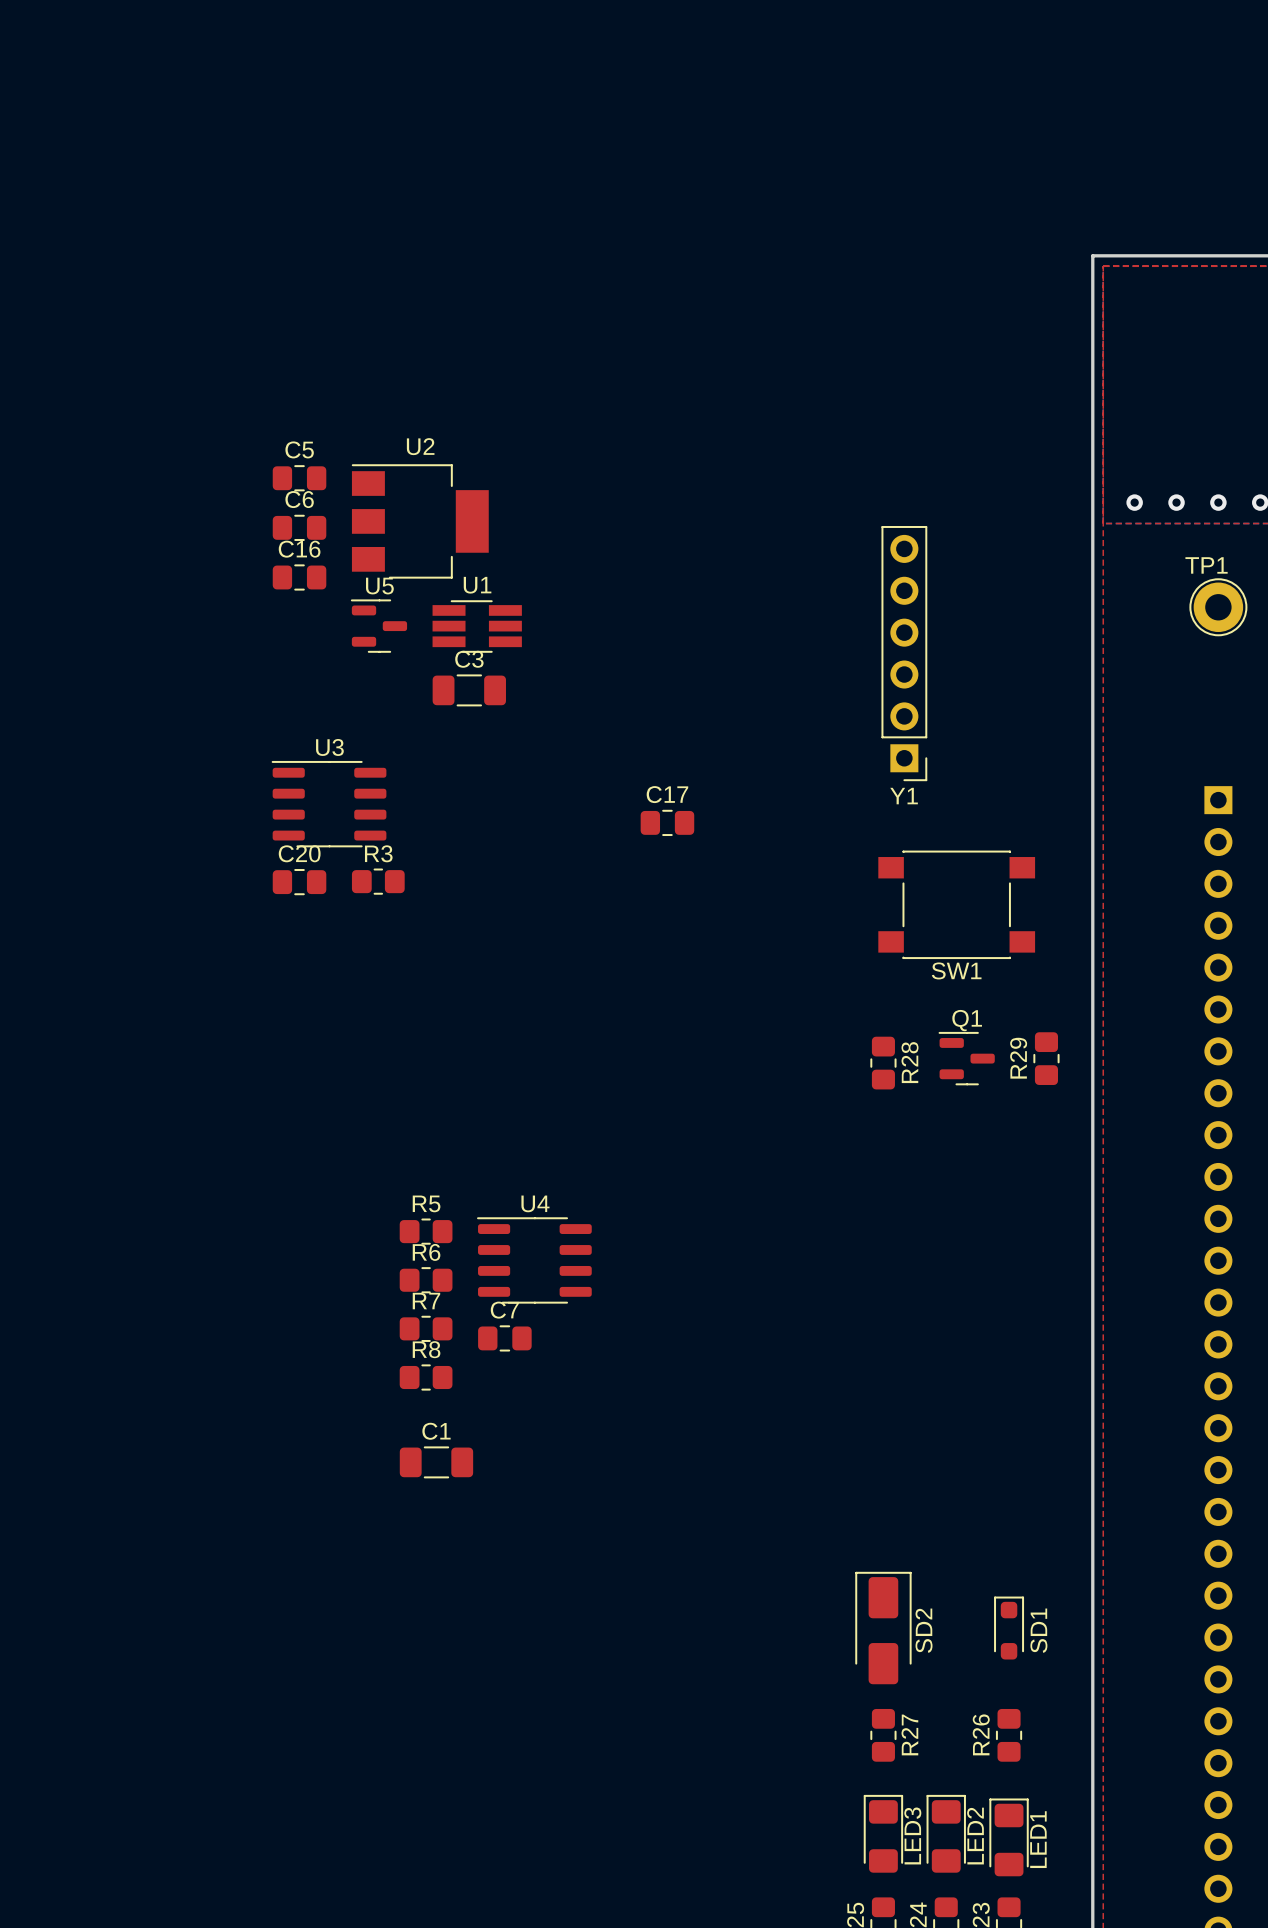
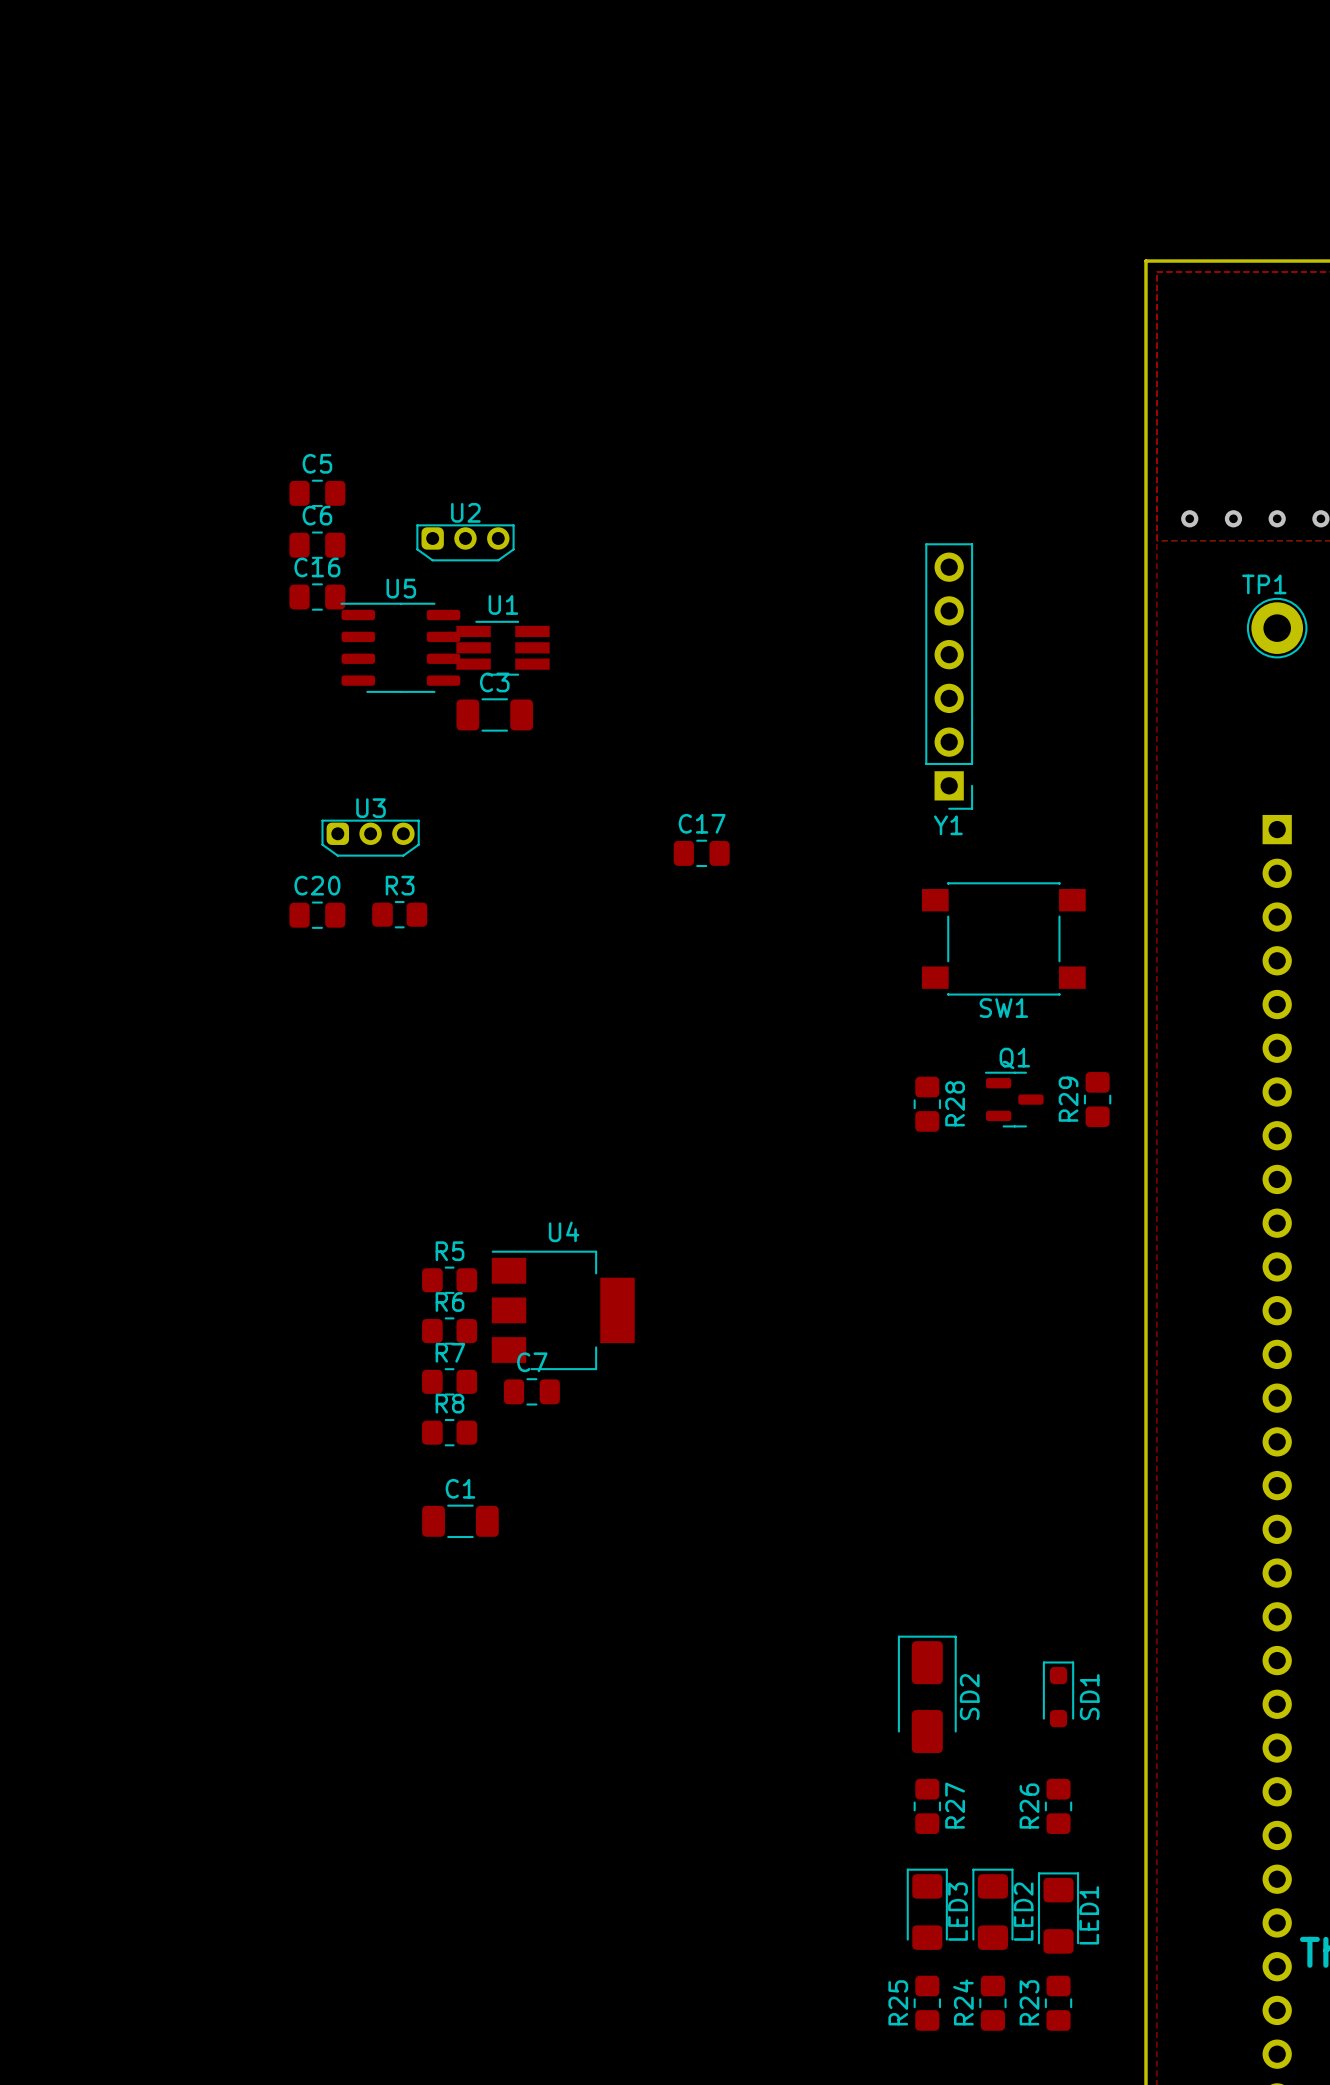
U2 name position: U2 (420, 446) -> U2 (465, 512)
U2 footprint: [351, 464, 489, 579] -> [416, 524, 515, 562]
U5 footprint: [350, 599, 408, 653] -> [340, 602, 461, 693]
U3 footprint: [271, 760, 387, 848] -> [321, 819, 420, 857]
U4 footprint: [477, 1217, 592, 1304] -> [491, 1250, 635, 1371]

